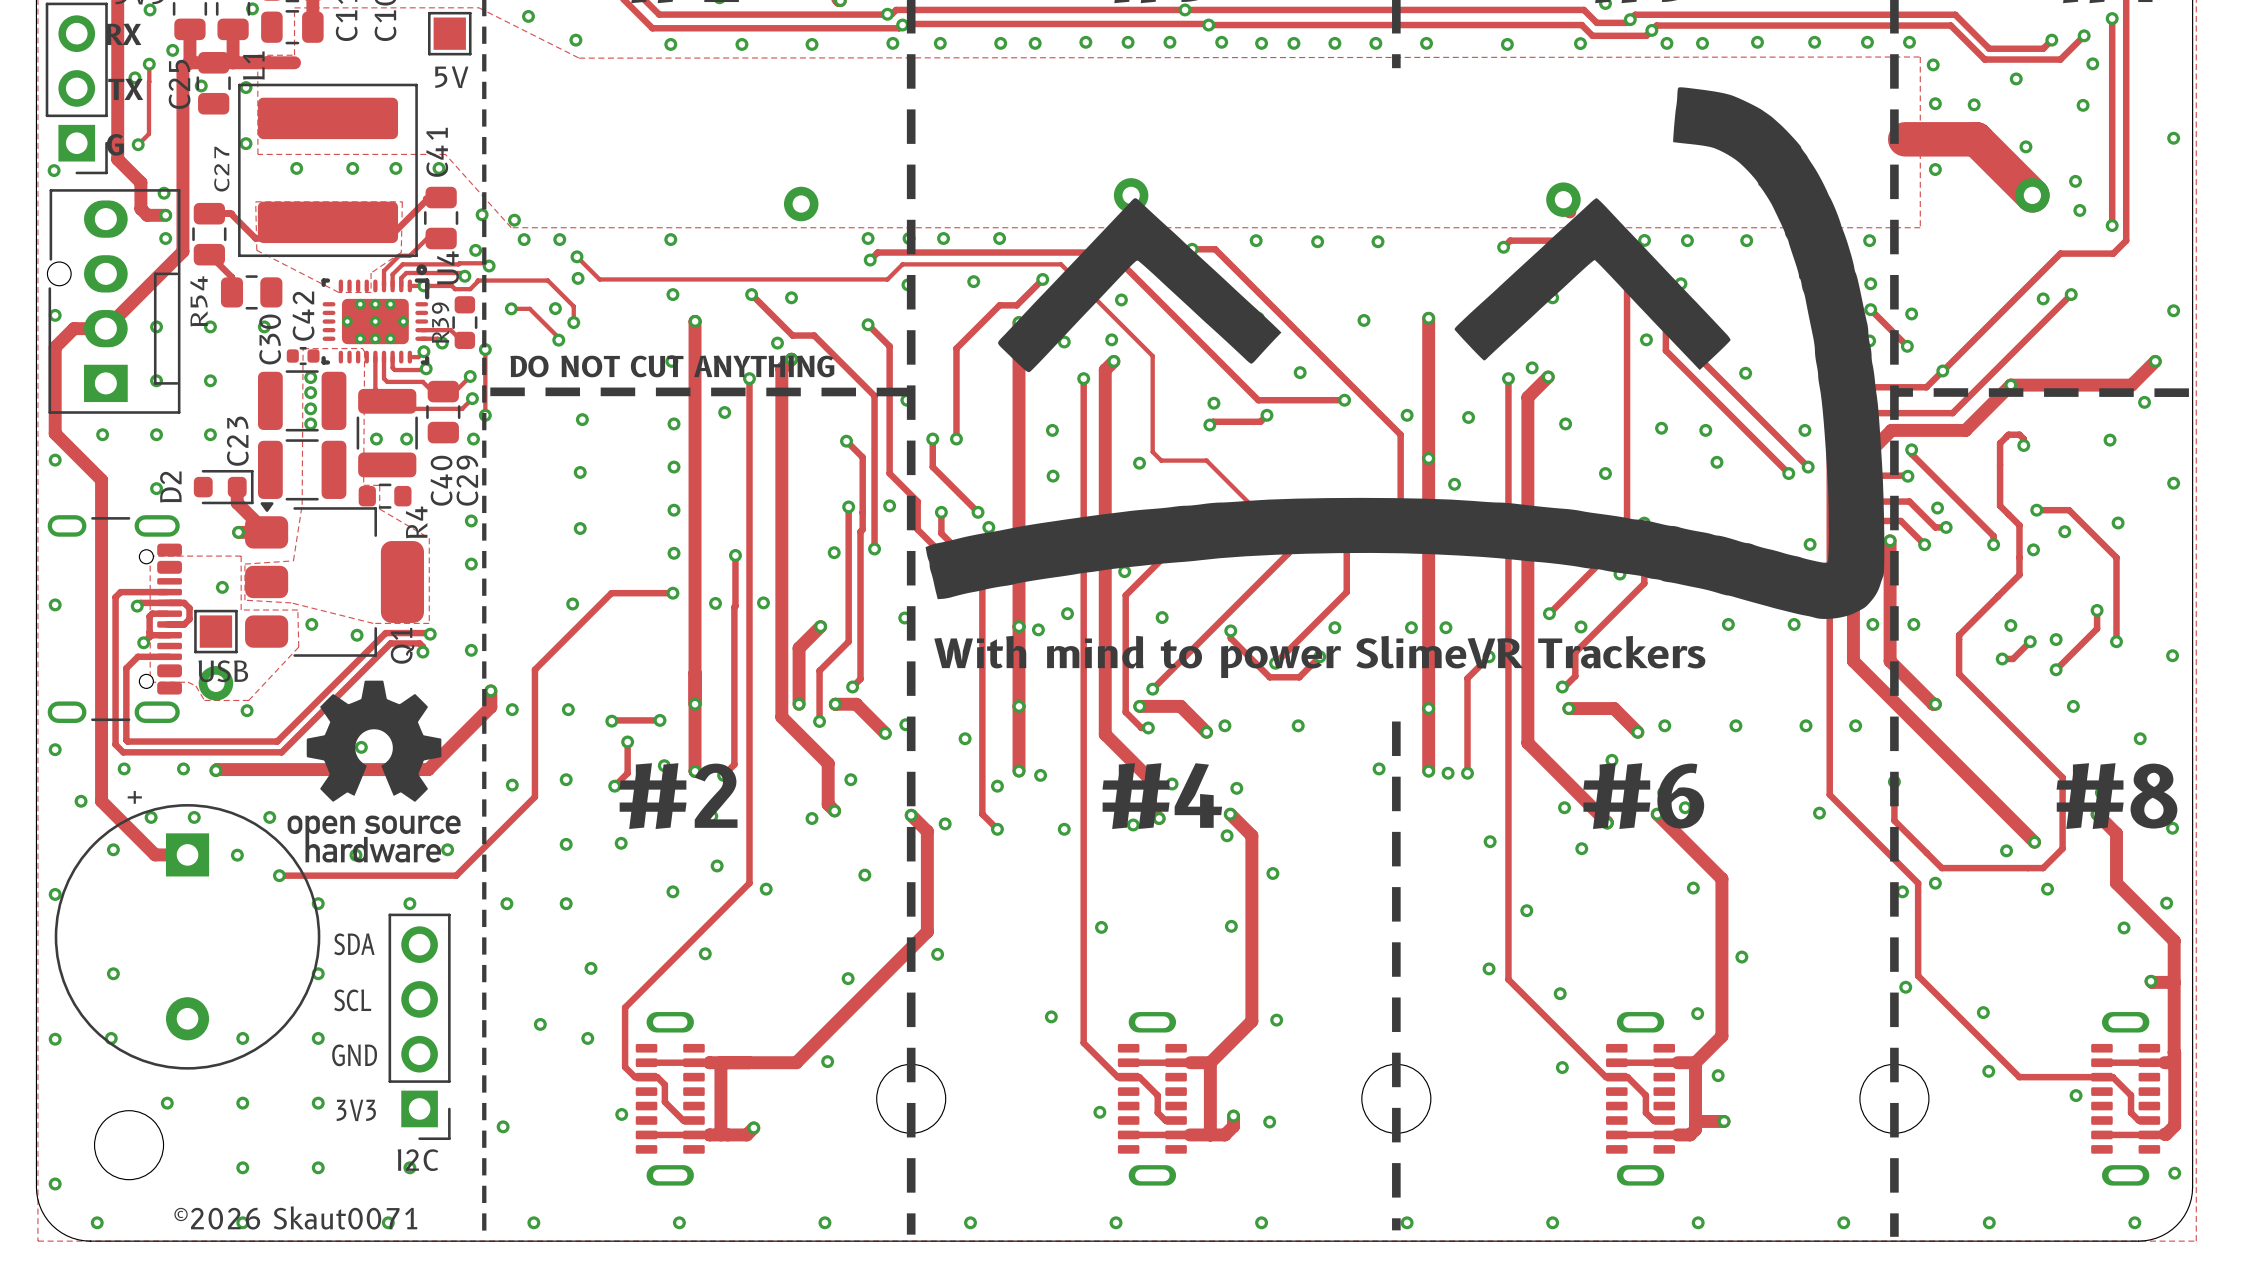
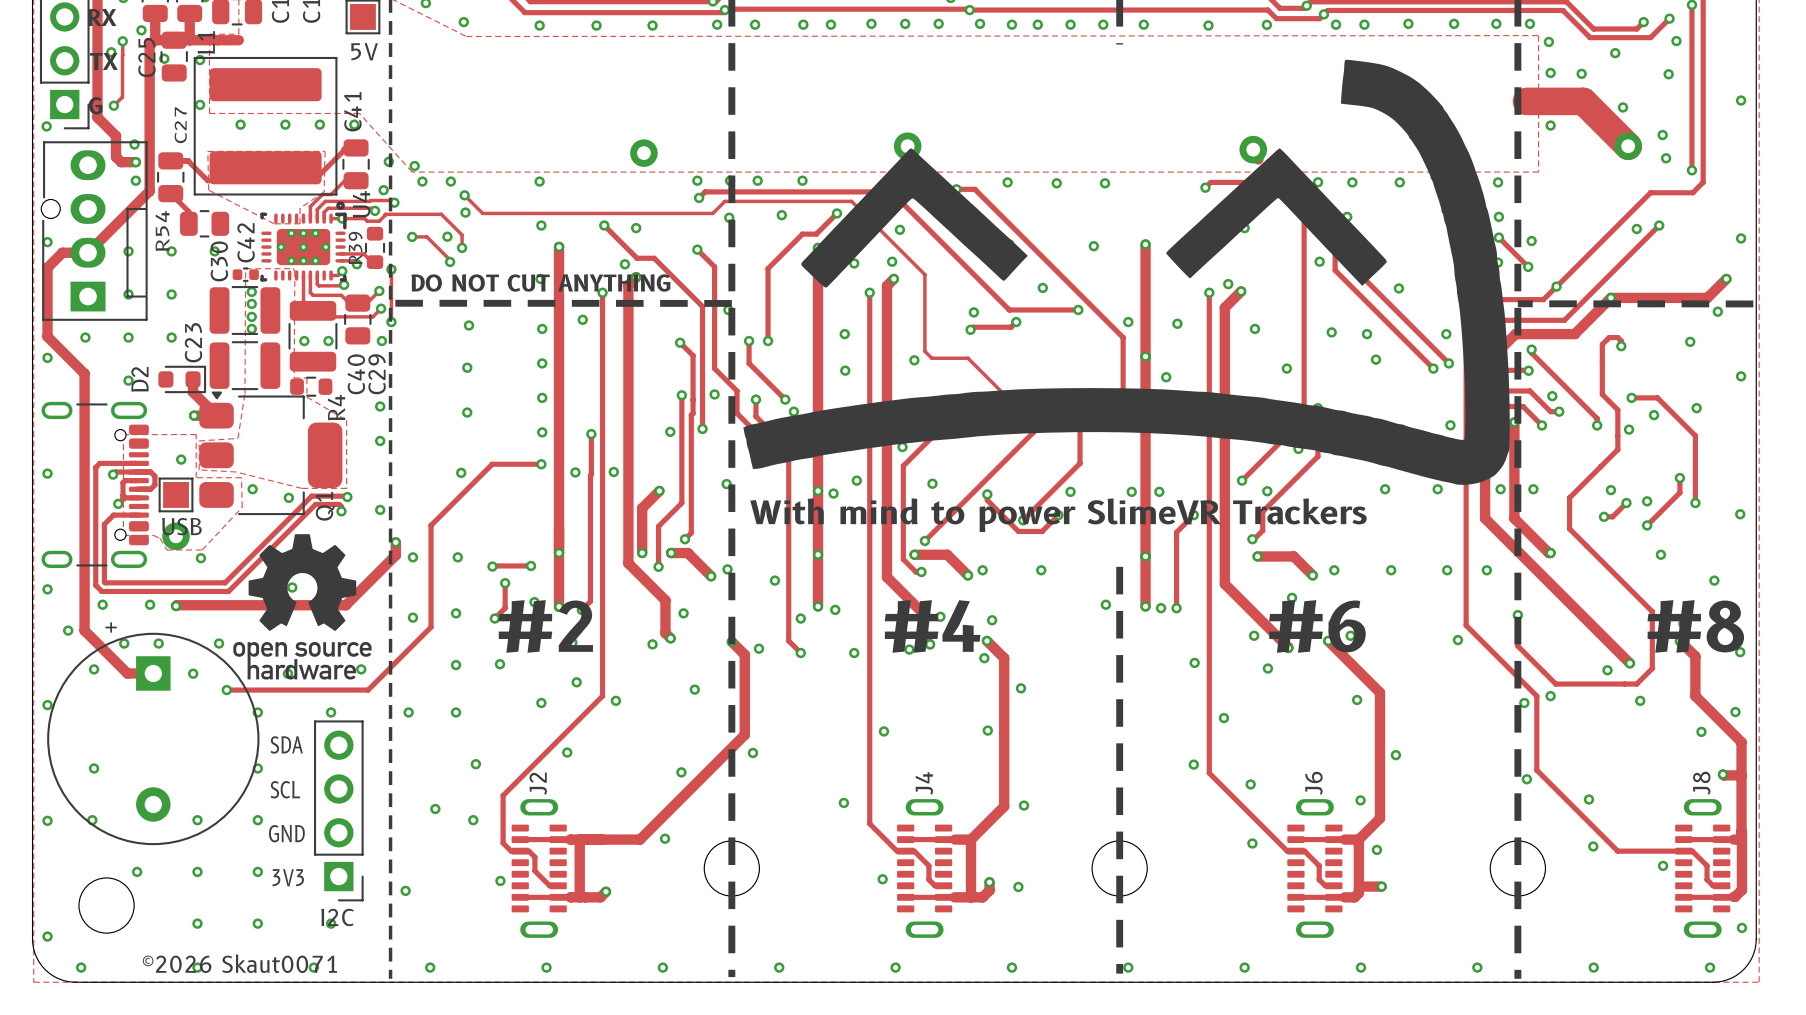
J2 name: none -> J2 (538, 783)
J4 name: none -> J4 (924, 783)
J6 name: none -> J6 (1313, 783)
J8 name: none -> J8 (1701, 783)

